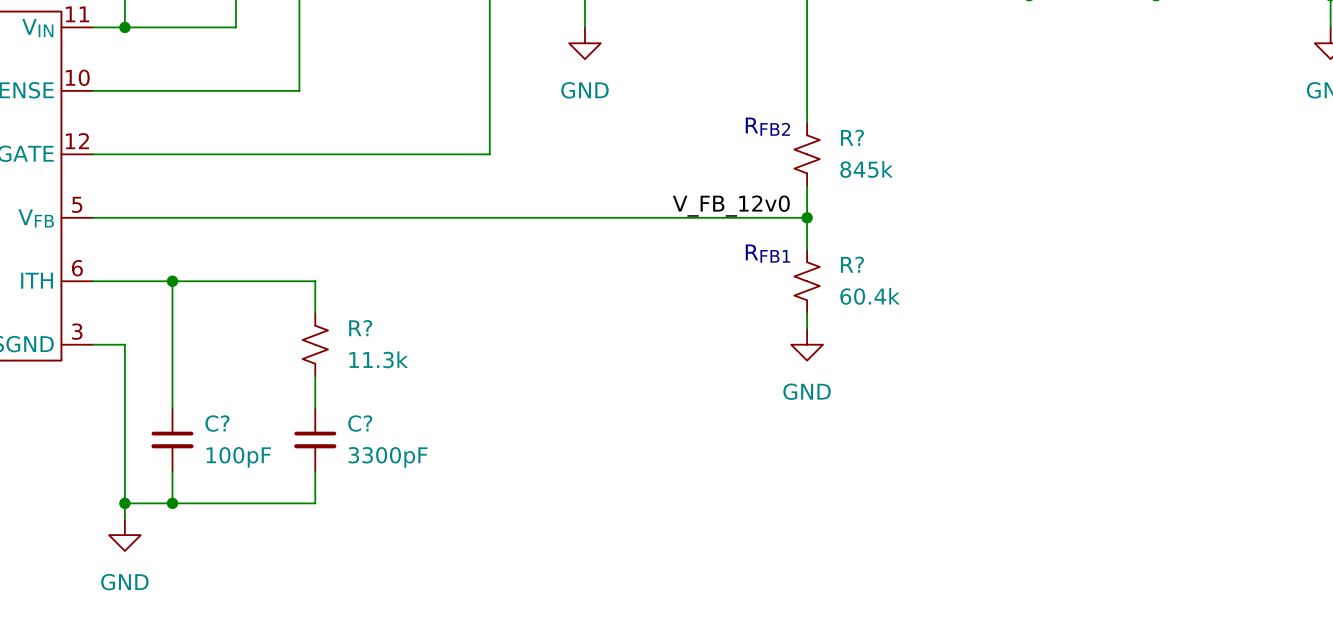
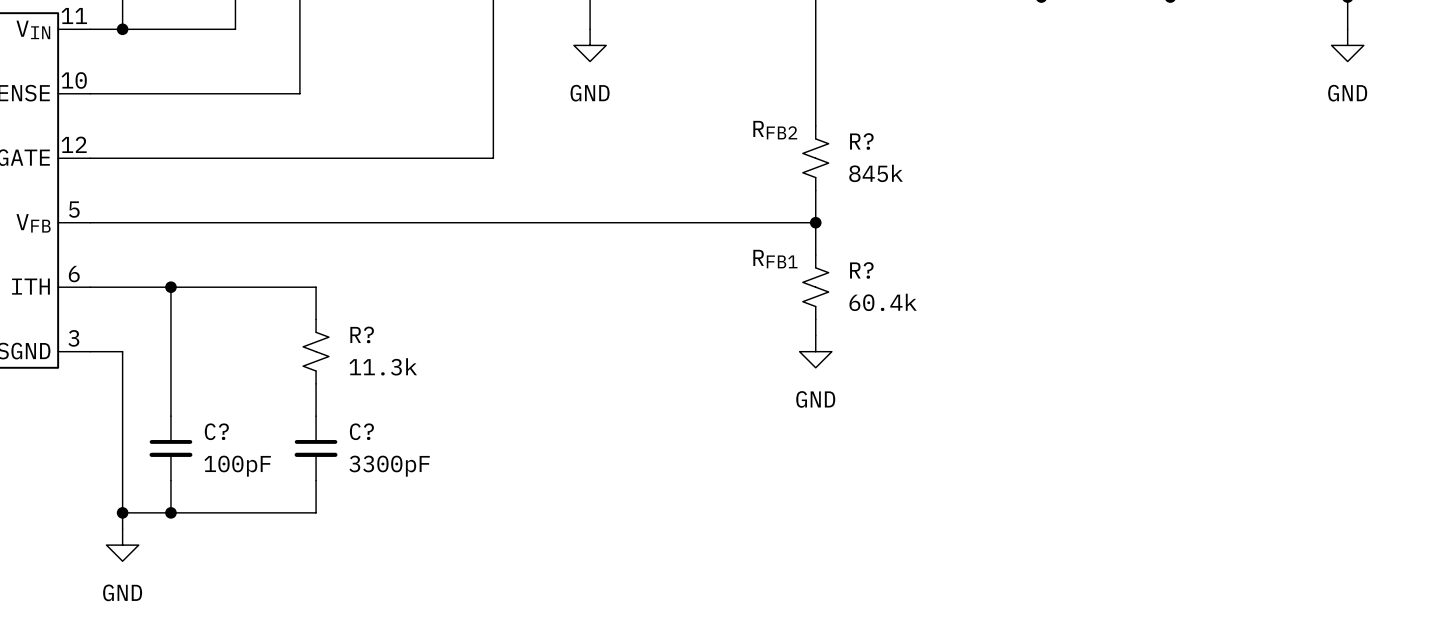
label: V_FB_12v0 (731, 206) -> none

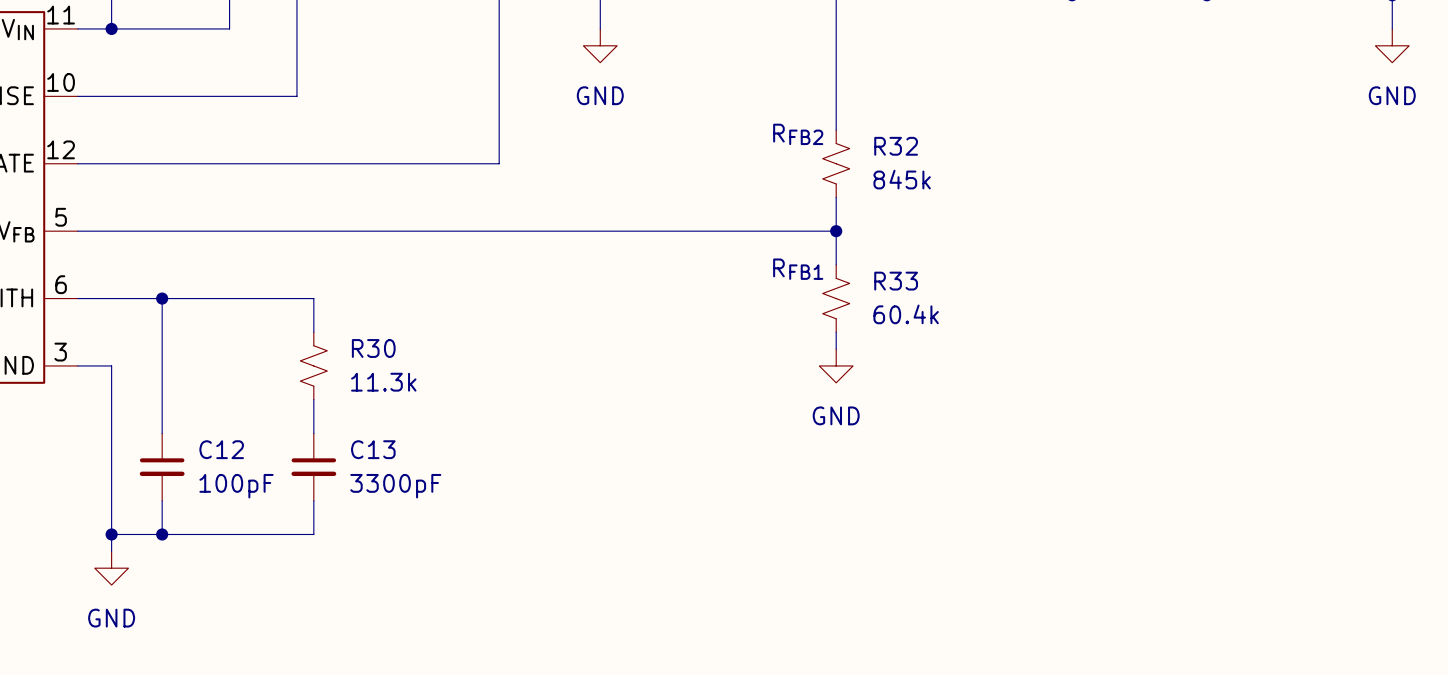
R? name: R? (861, 141) -> R32 (896, 146)
R? name: R? (861, 270) -> R33 (896, 281)
R? name: R? (362, 334) -> R30 (373, 348)
C? name: C? (216, 431) -> C12 (221, 449)
C? name: C? (361, 431) -> C13 (373, 449)

